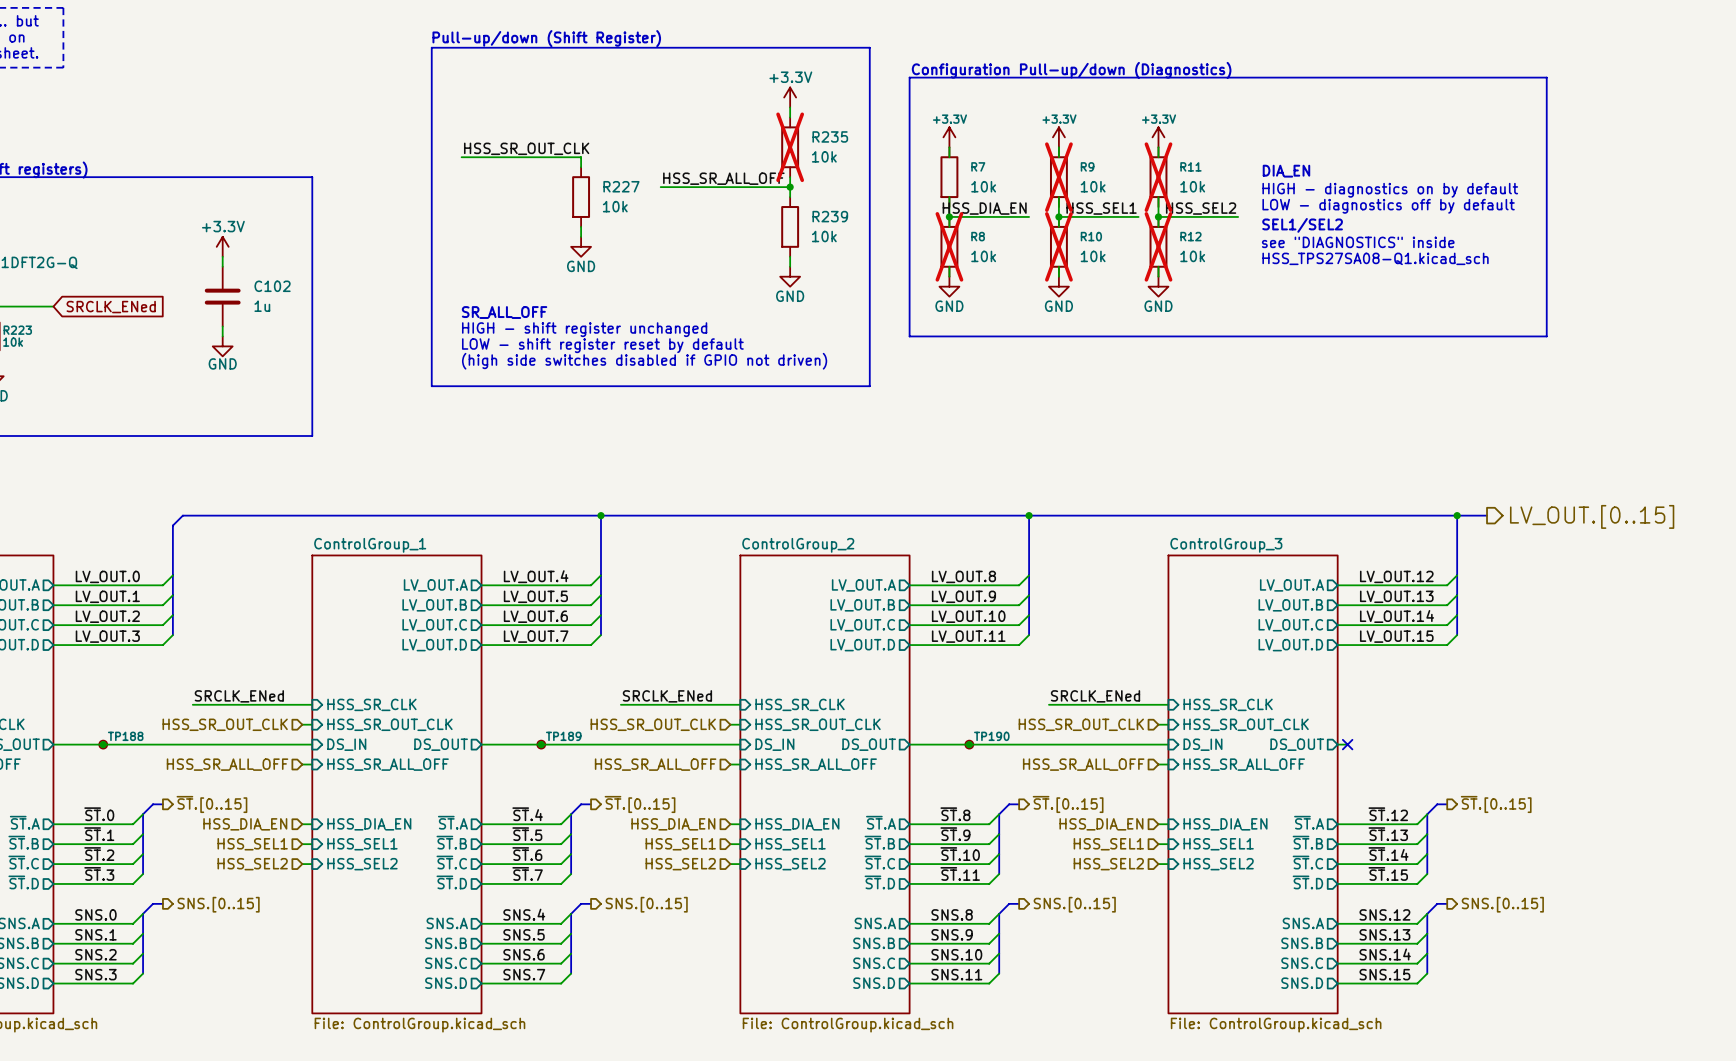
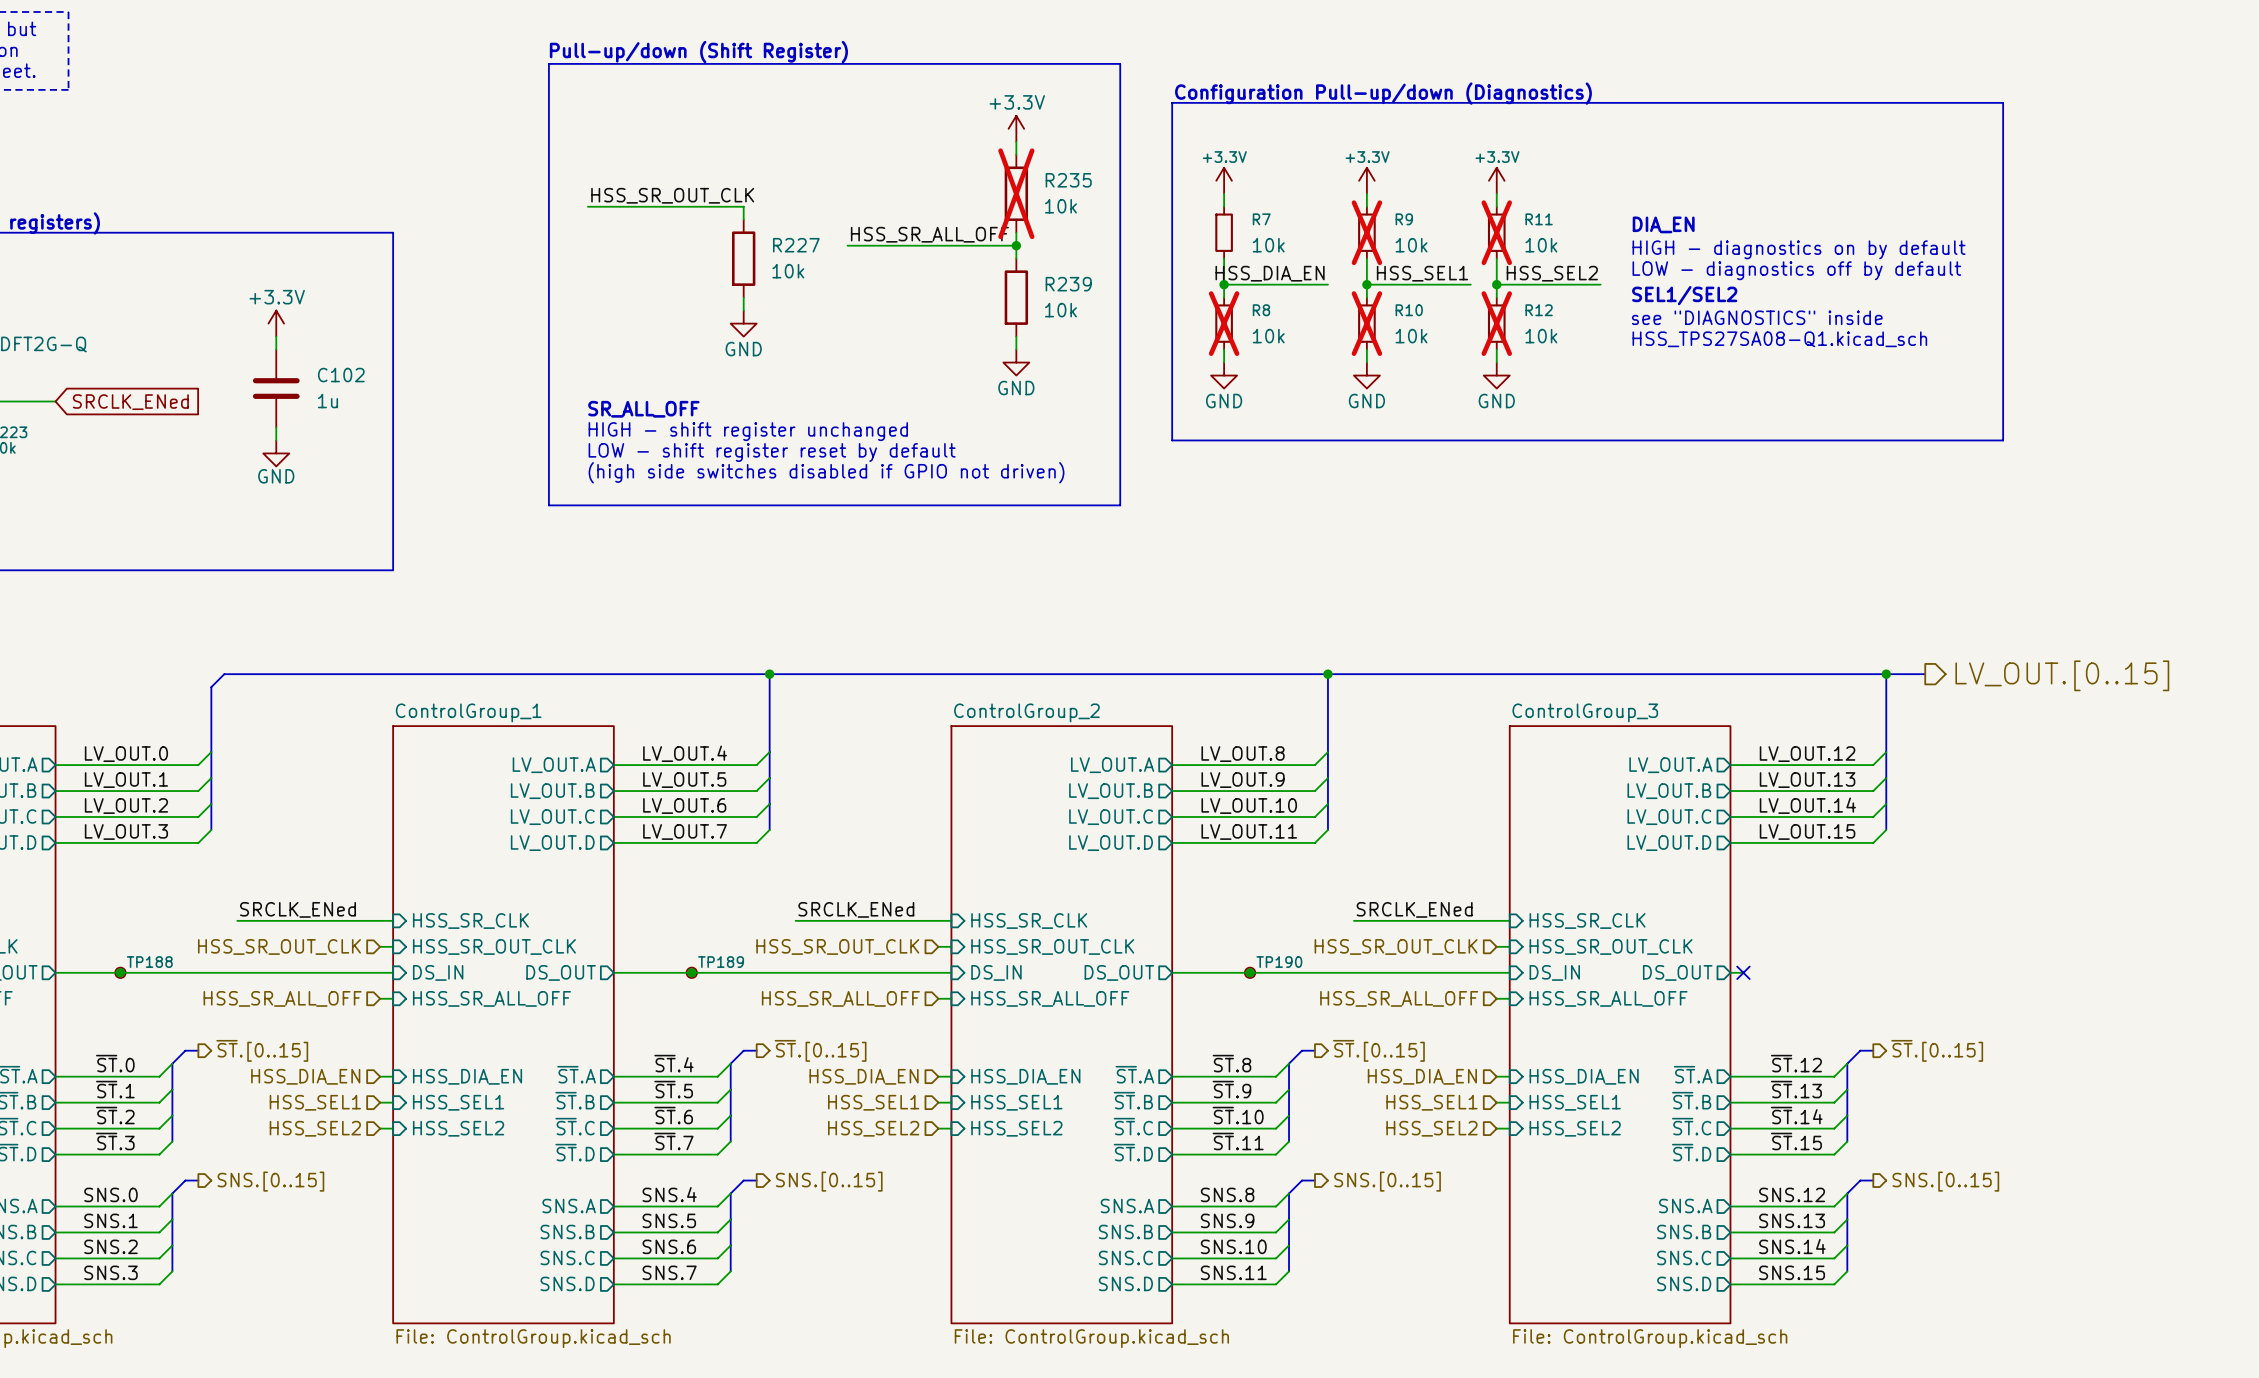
R7 symbol: [940, 147, 959, 208] -> [1215, 206, 1233, 259]
R9 symbol: [1049, 147, 1068, 208] -> [1358, 206, 1376, 259]
R11 symbol: [1149, 147, 1168, 208] -> [1487, 206, 1506, 259]
R8 symbol: [940, 216, 959, 277] -> [1215, 297, 1233, 350]
R10 symbol: [1049, 216, 1068, 277] -> [1358, 297, 1376, 350]
R12 symbol: [1149, 216, 1168, 277] -> [1487, 297, 1506, 350]

